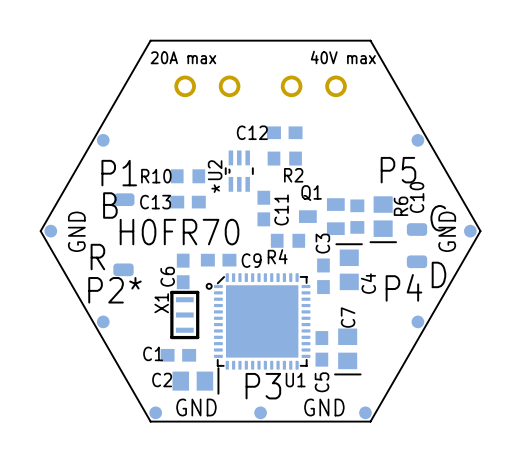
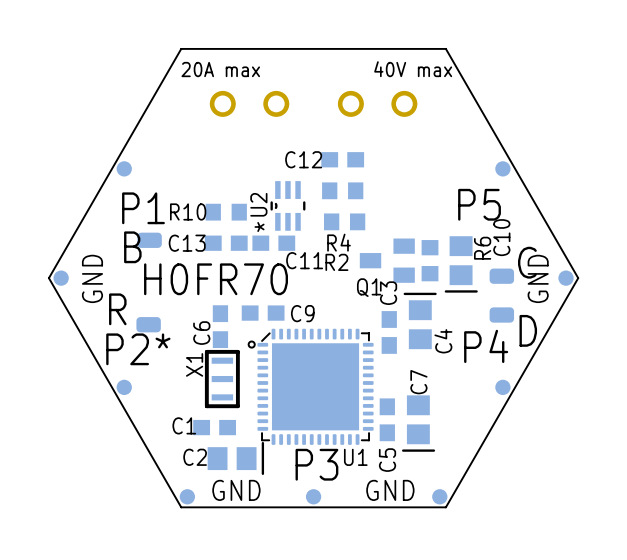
R2 name position: R2 (293, 175) -> R2 (336, 262)
Q1 name position: Q1 (311, 193) -> Q1 (369, 287)
C11 rotation: 0° (263, 208) -> 90° clockwise (273, 243)
C11 position: (263, 208) -> (273, 243)
R4 position: (288, 240) -> (344, 221)
R4 name position: R4 (277, 256) -> R4 (339, 242)

